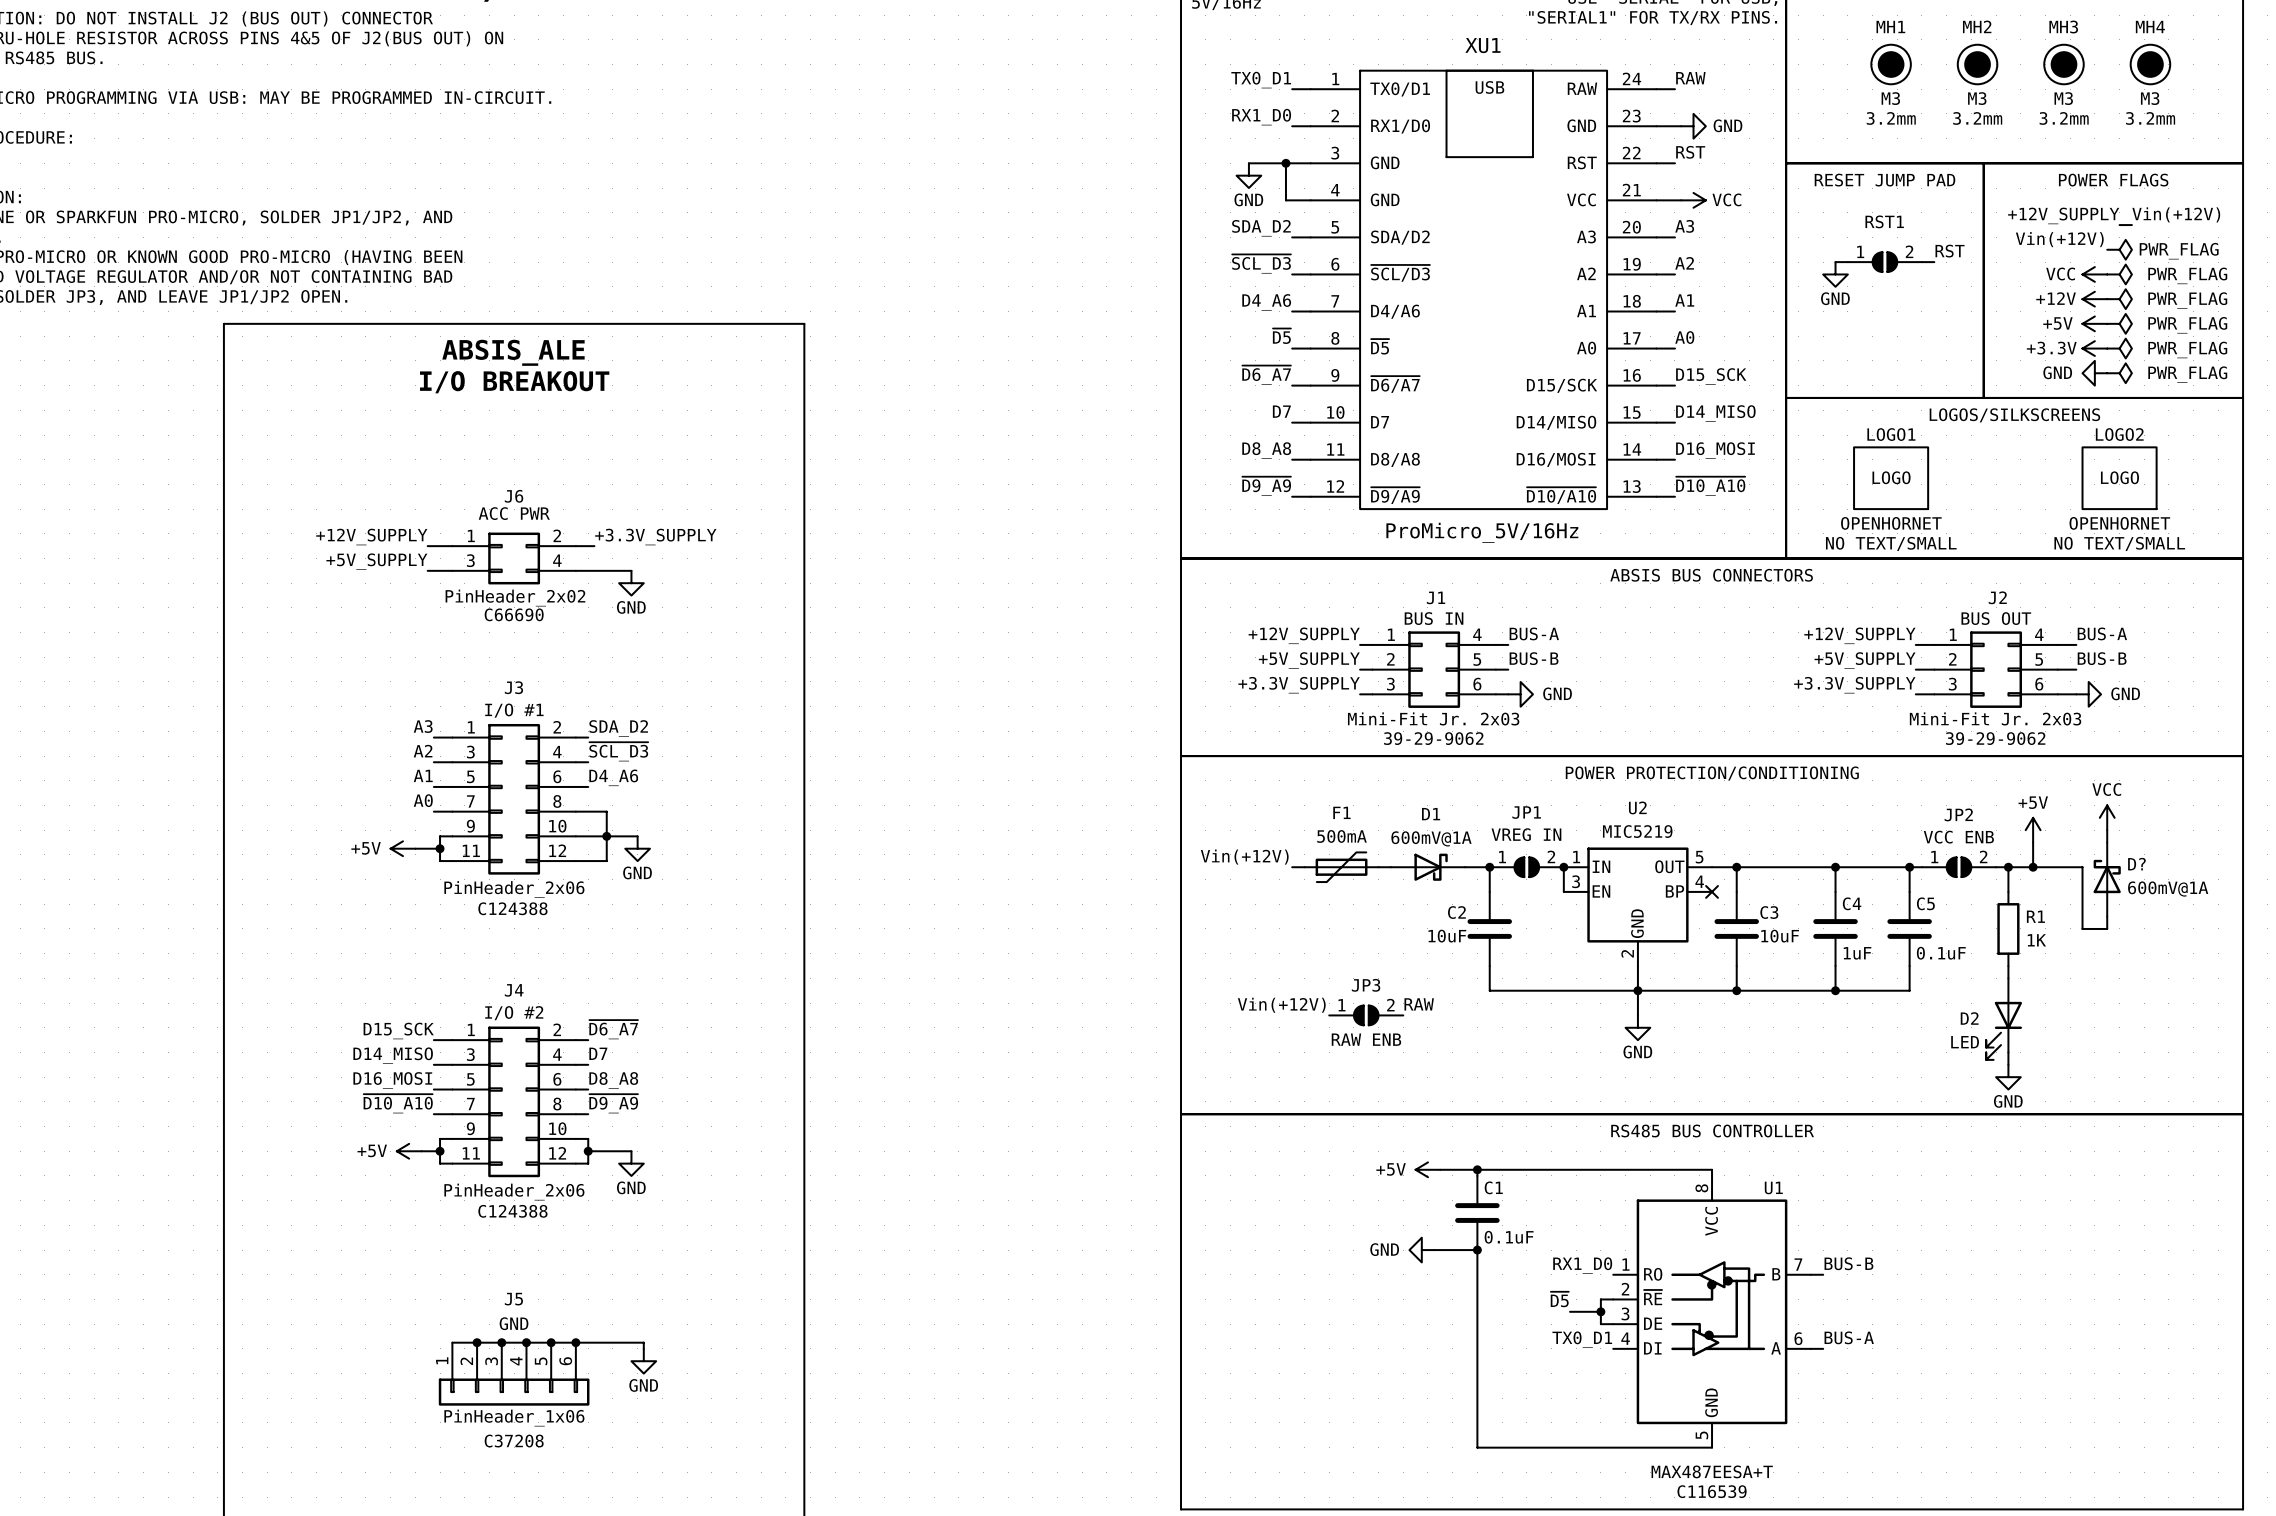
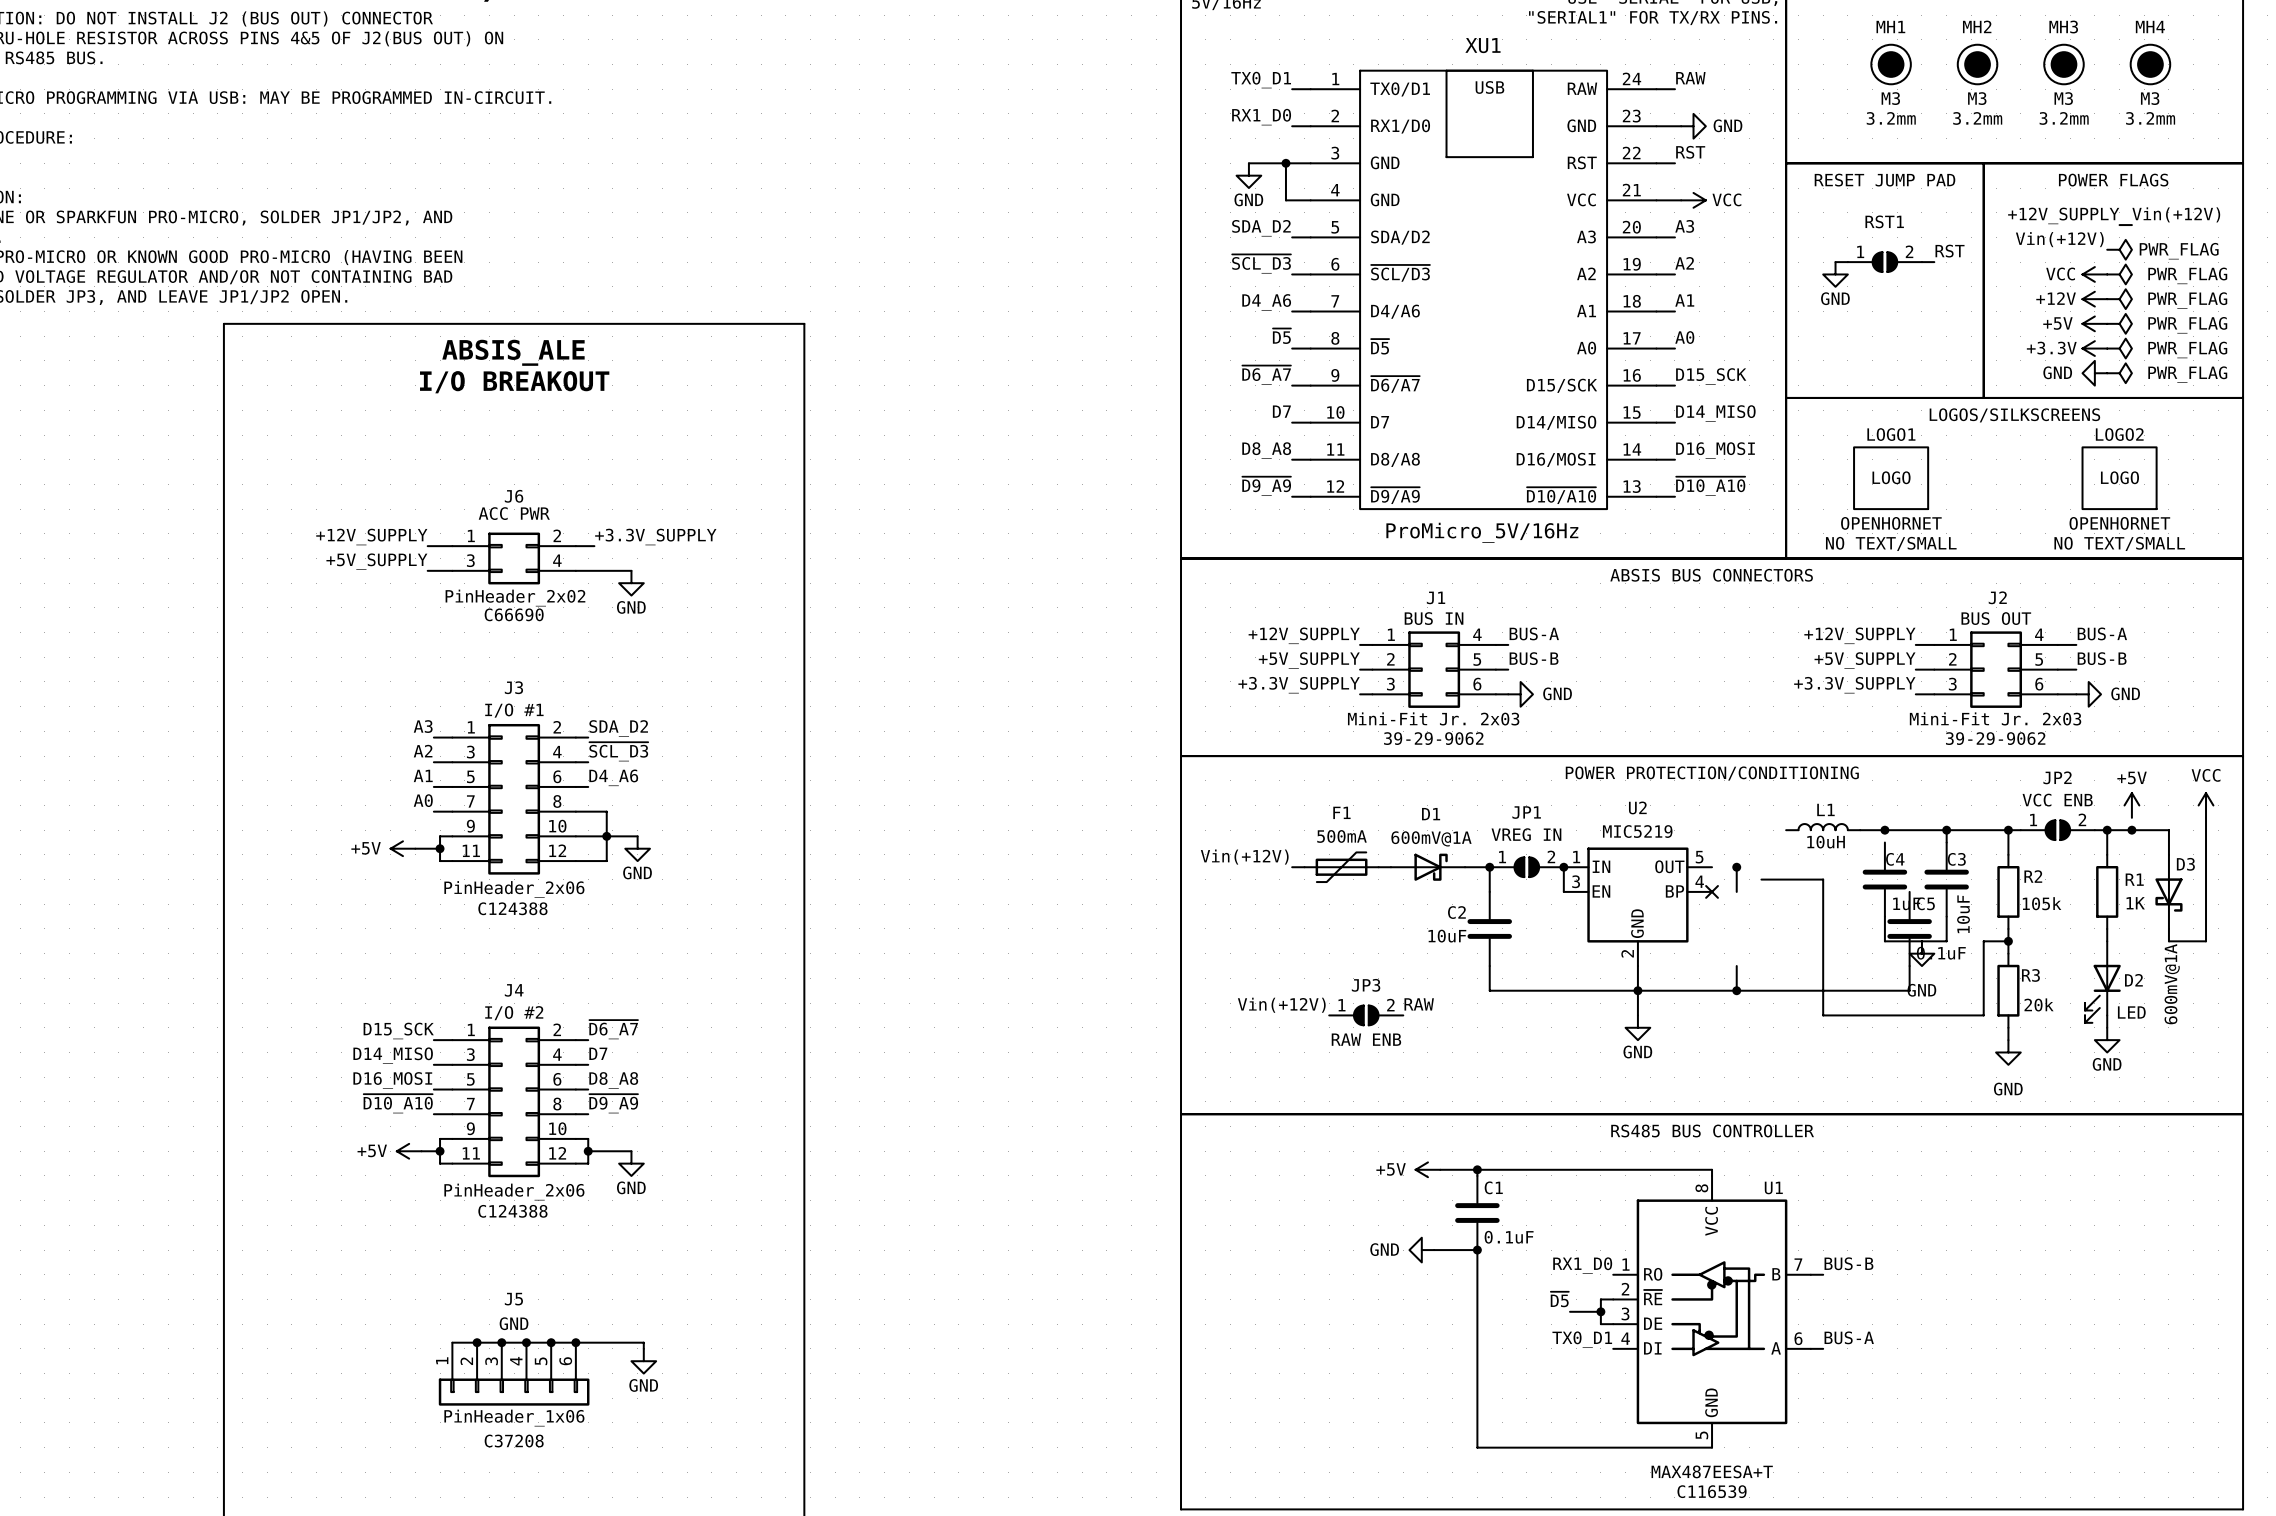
power symbol text position: VCC (2106, 789) -> VCC (2206, 775)
power symbol position: VCC (2107, 817) -> VCC (2206, 805)
wire: none -> (2206, 817) (2206, 941) (2168, 941) (2168, 928)
L1: none -> 10uH (1823, 827)
wire: none -> (1860, 830) (2020, 830)
junction: none -> (1884, 830)
junction: none -> (1946, 830)
junction: none -> (2008, 830)
power symbol position: +5V (2033, 830) -> +5V (2131, 805)
wire: none -> (2094, 830) (2168, 830) (2168, 854)
junction: none -> (2107, 830)
junction: none -> (2131, 830)
wire: (2033, 842) (2033, 867) -> none
wire: (1712, 867) (1921, 867) -> none
wire: (1835, 867) (1835, 891) -> none
junction: (1835, 867) -> none
wire: (1909, 867) (1909, 891) -> (2008, 830) (2008, 854)
junction: (1909, 867) -> none
JP2 position: (1959, 867) -> (2057, 830)
wire: (1996, 867) (2082, 867) (2082, 928) (2107, 928) (2107, 916) -> none
wire: (2008, 867) (2008, 891) -> (2008, 928) (2008, 953)
junction: (2008, 867) -> none
junction: (2033, 867) -> none
wire: none -> (1761, 879) (1823, 879) (1823, 1015) (1983, 1015) (1983, 941) (2008, 941)
D?: 600mV@1A (2107, 879) -> none
R2: none -> 105k (2008, 891)
D3: none -> 600mV@1A (2168, 891)
C4 name position: C4 (1852, 903) -> C4 (1895, 859)
C3 name position: C3 (1769, 912) -> C3 (1956, 859)
wire: none -> (1884, 916) (1884, 941) (1946, 941) (1946, 916)
C3 position: (1736, 928) -> (1946, 879)
C4 position: (1835, 928) -> (1884, 879)
R1 position: (2008, 928) -> (2107, 891)
C3 value rotation: 0° (1780, 936) -> 90° counterclockwise (1963, 914)
junction: none -> (2008, 941)
power symbol: none -> GND (1921, 953)
wire: (1835, 966) (1835, 990) -> none
wire: (2008, 966) (2008, 978) -> (2107, 928) (2107, 941)
junction: (1835, 990) -> none
R3: none -> 20k (2008, 990)
D2 name position: D2 (1969, 1018) -> D2 (2133, 980)
D2 position: (2004, 1019) -> (2102, 982)
power symbol: none -> GND (2107, 1040)
D2 value position: LED (1965, 1042) -> LED (2131, 1012)
wire: (2008, 1052) (2008, 1064) -> (2107, 1015) (2107, 1027)
power symbol position: GND (2008, 1077) -> GND (2008, 1052)
power symbol text position: GND (2008, 1101) -> GND (2008, 1089)

